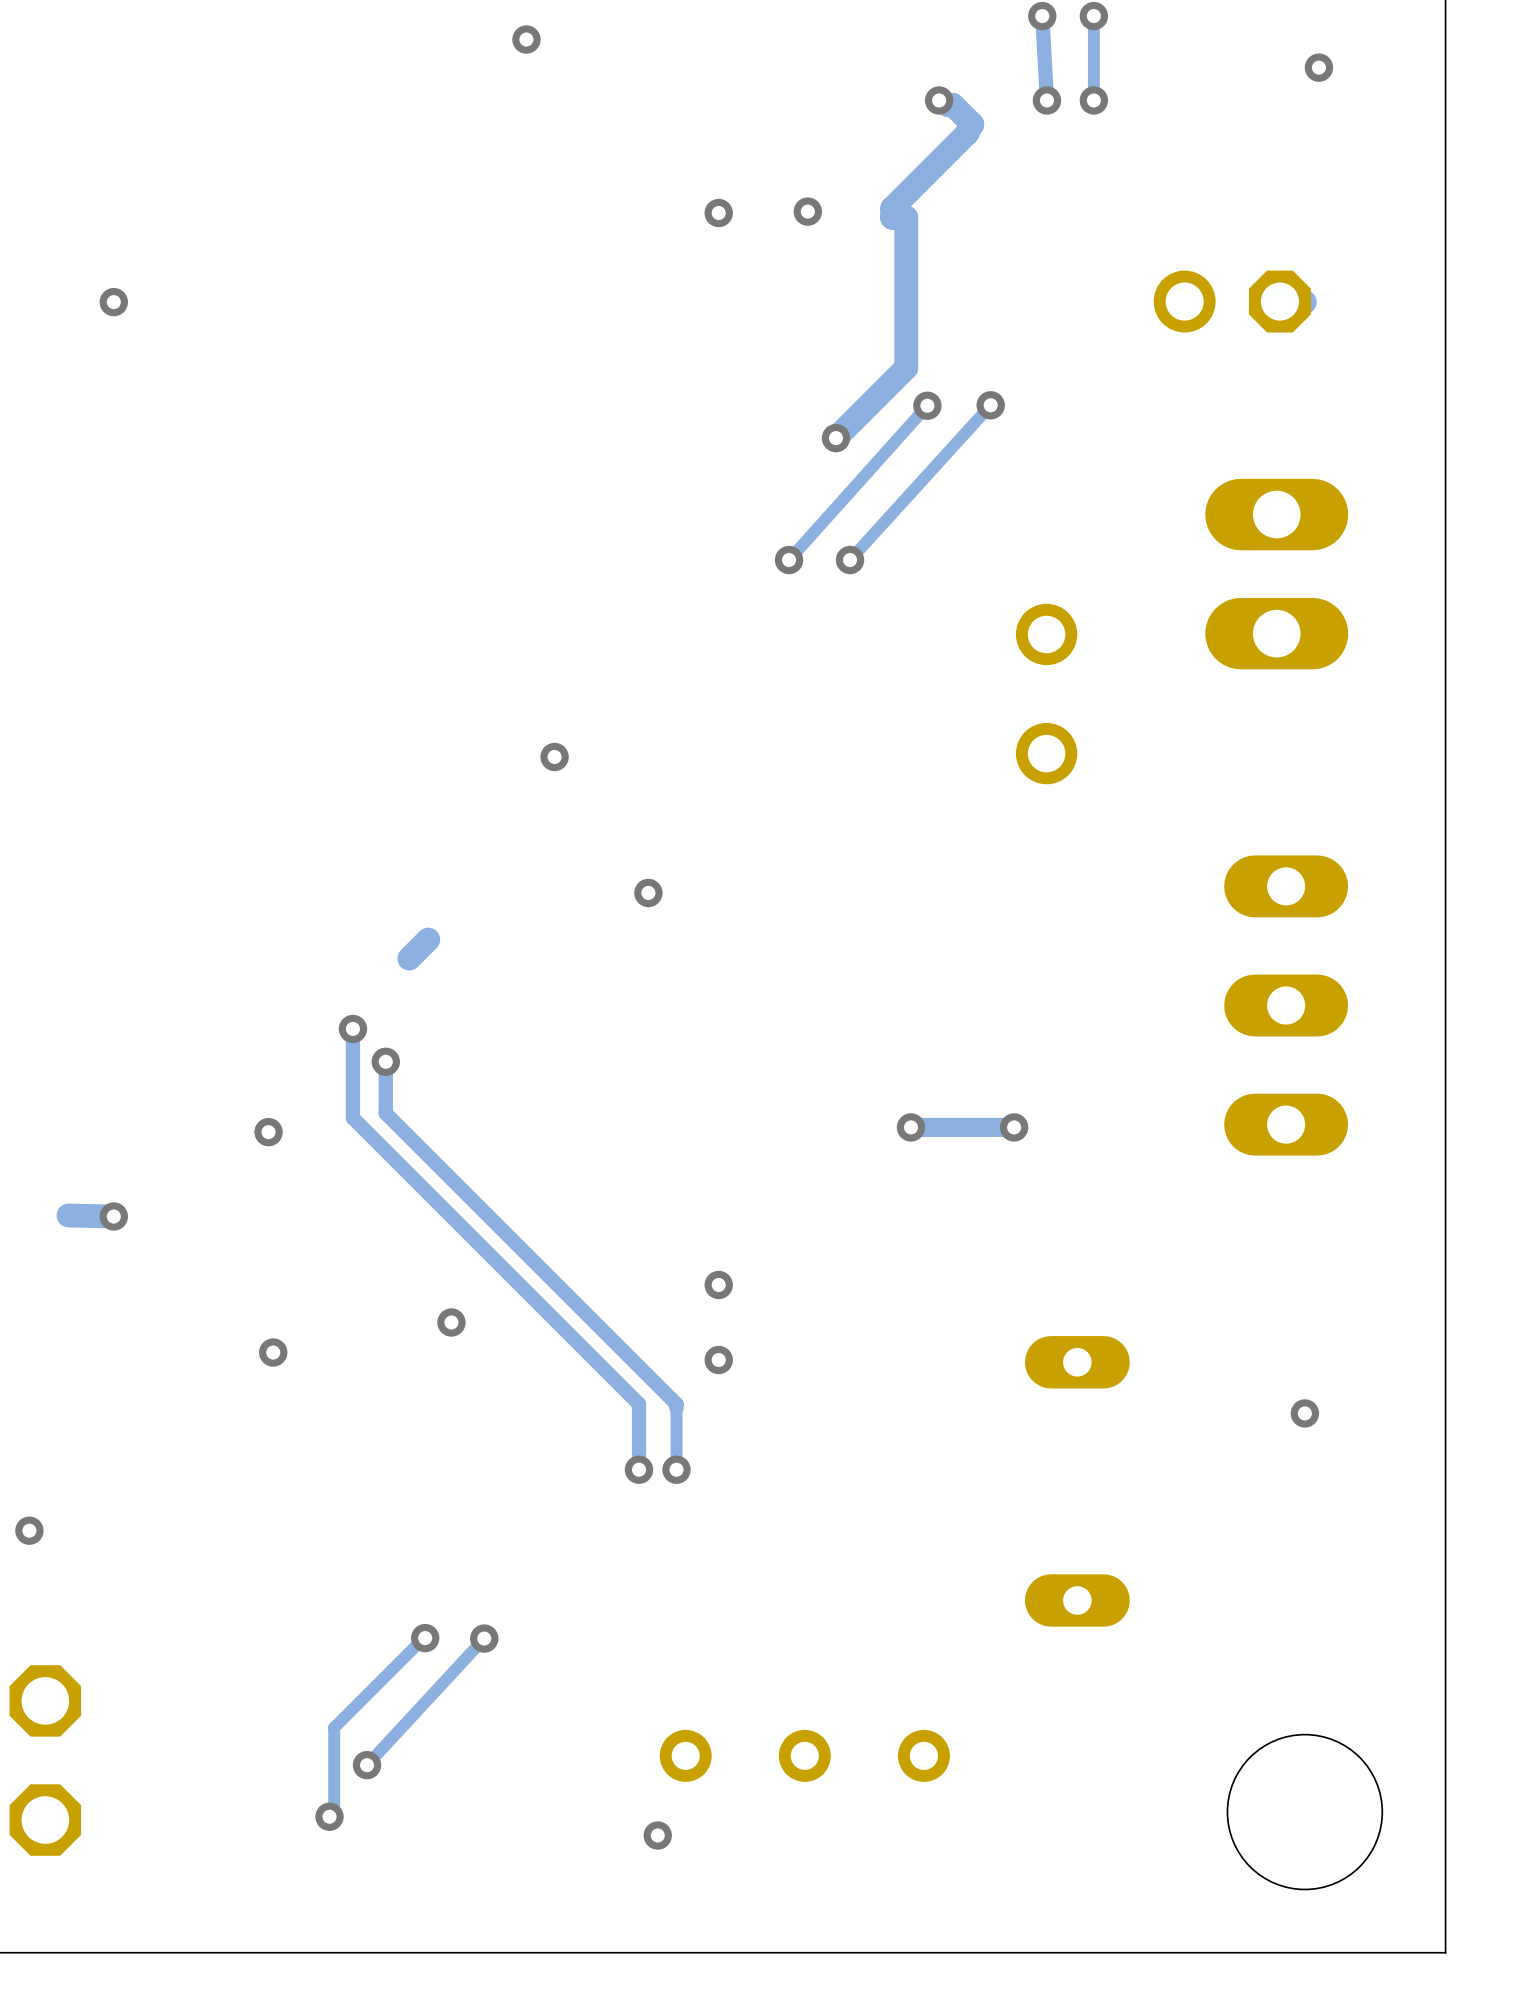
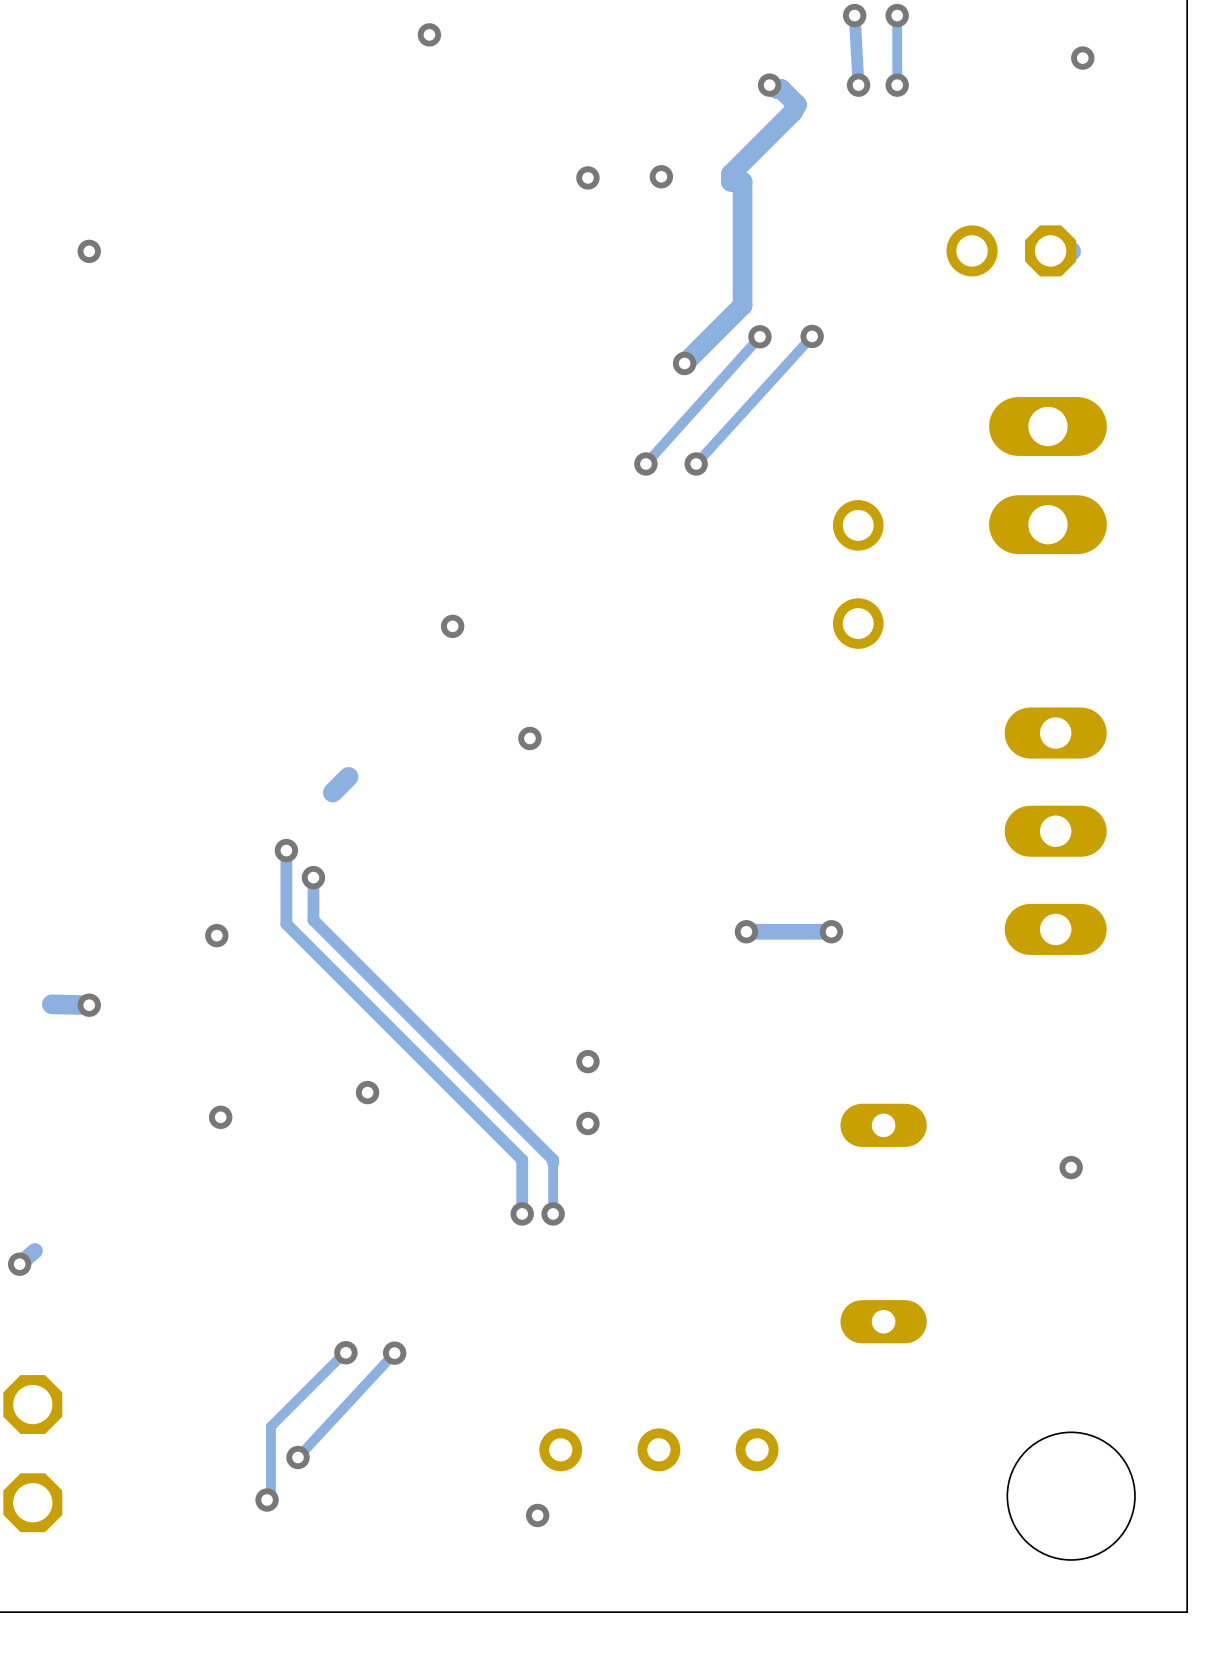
track: none -> (34, 1250) (19, 1264)

